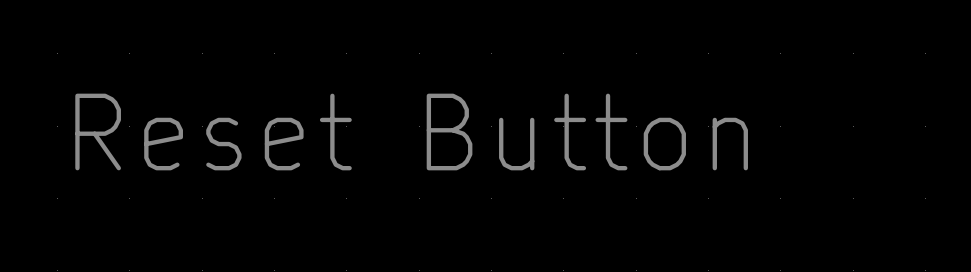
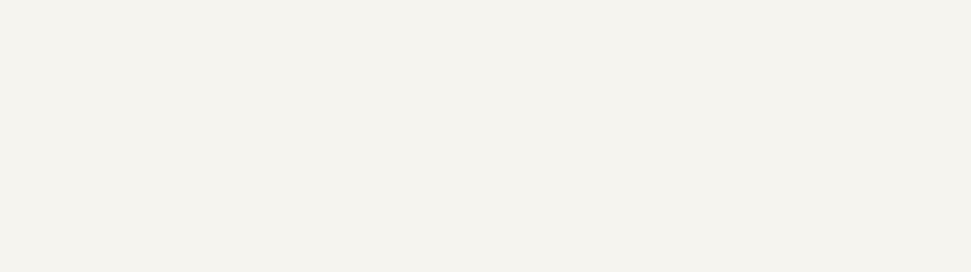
text: Reset Button (411, 131) -> none

